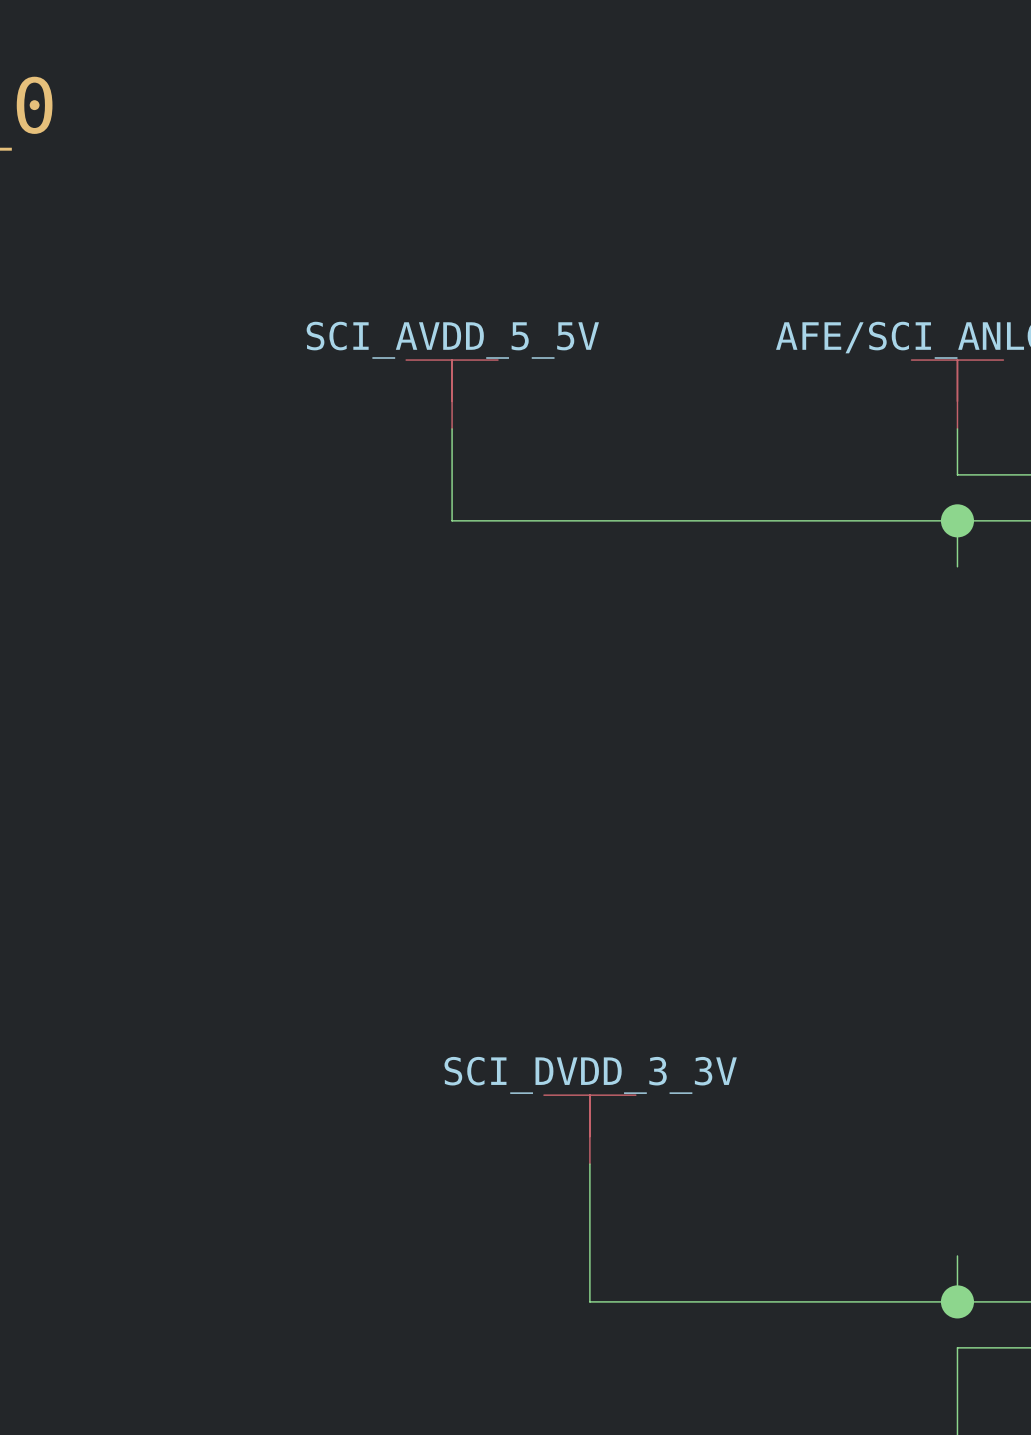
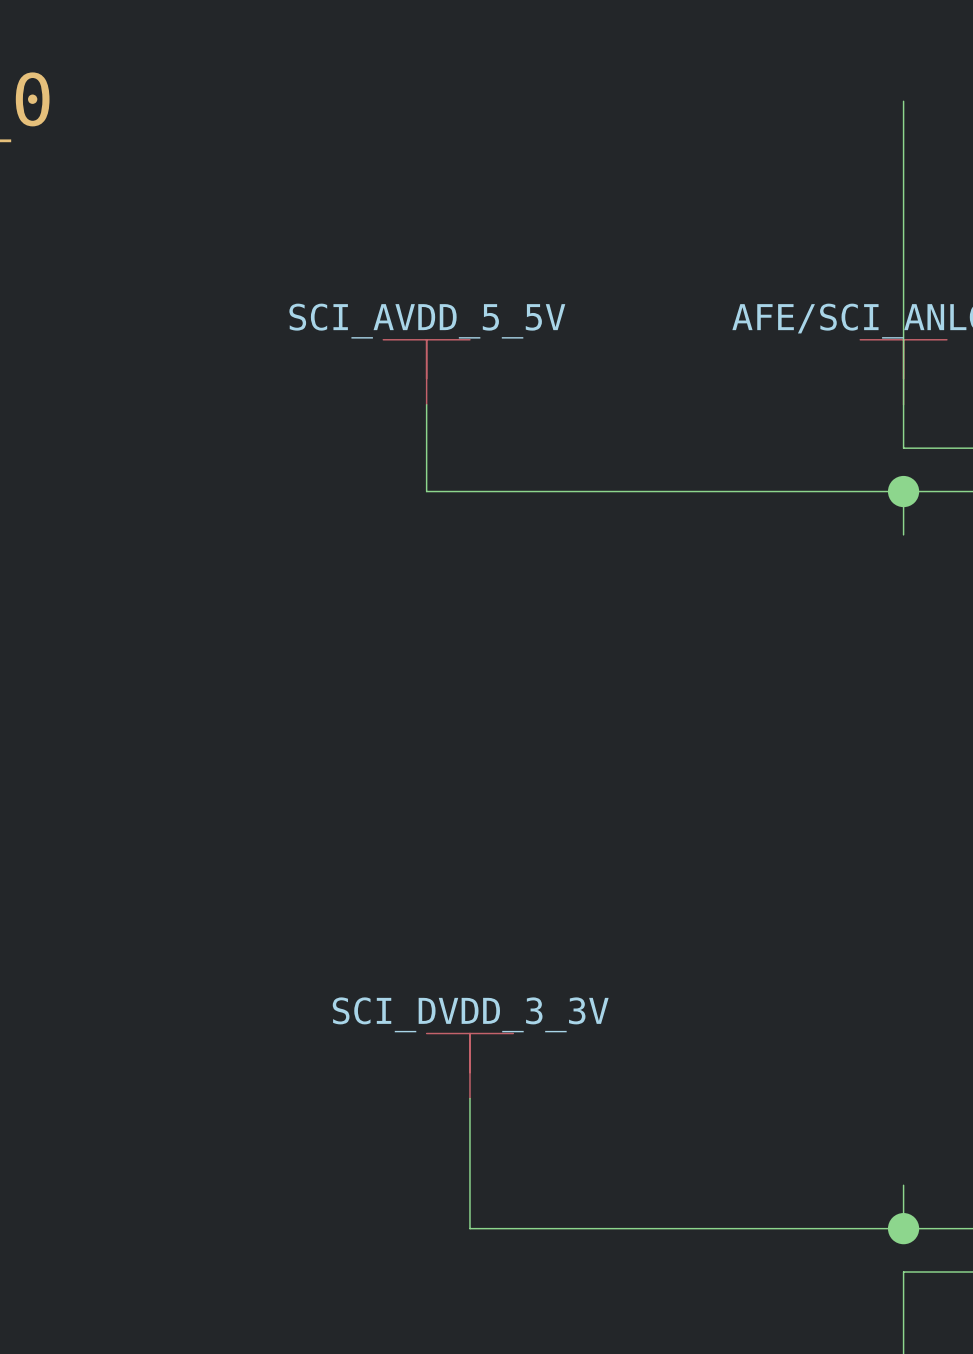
wire: none -> (903, 101) (903, 404)
power symbol position: SCI_DVDD_3_3V (589, 1129) -> SCI_DVDD_3_3V (469, 1066)
wire: (589, 1164) (589, 1301) -> (469, 1098) (469, 1228) (556, 1228)

